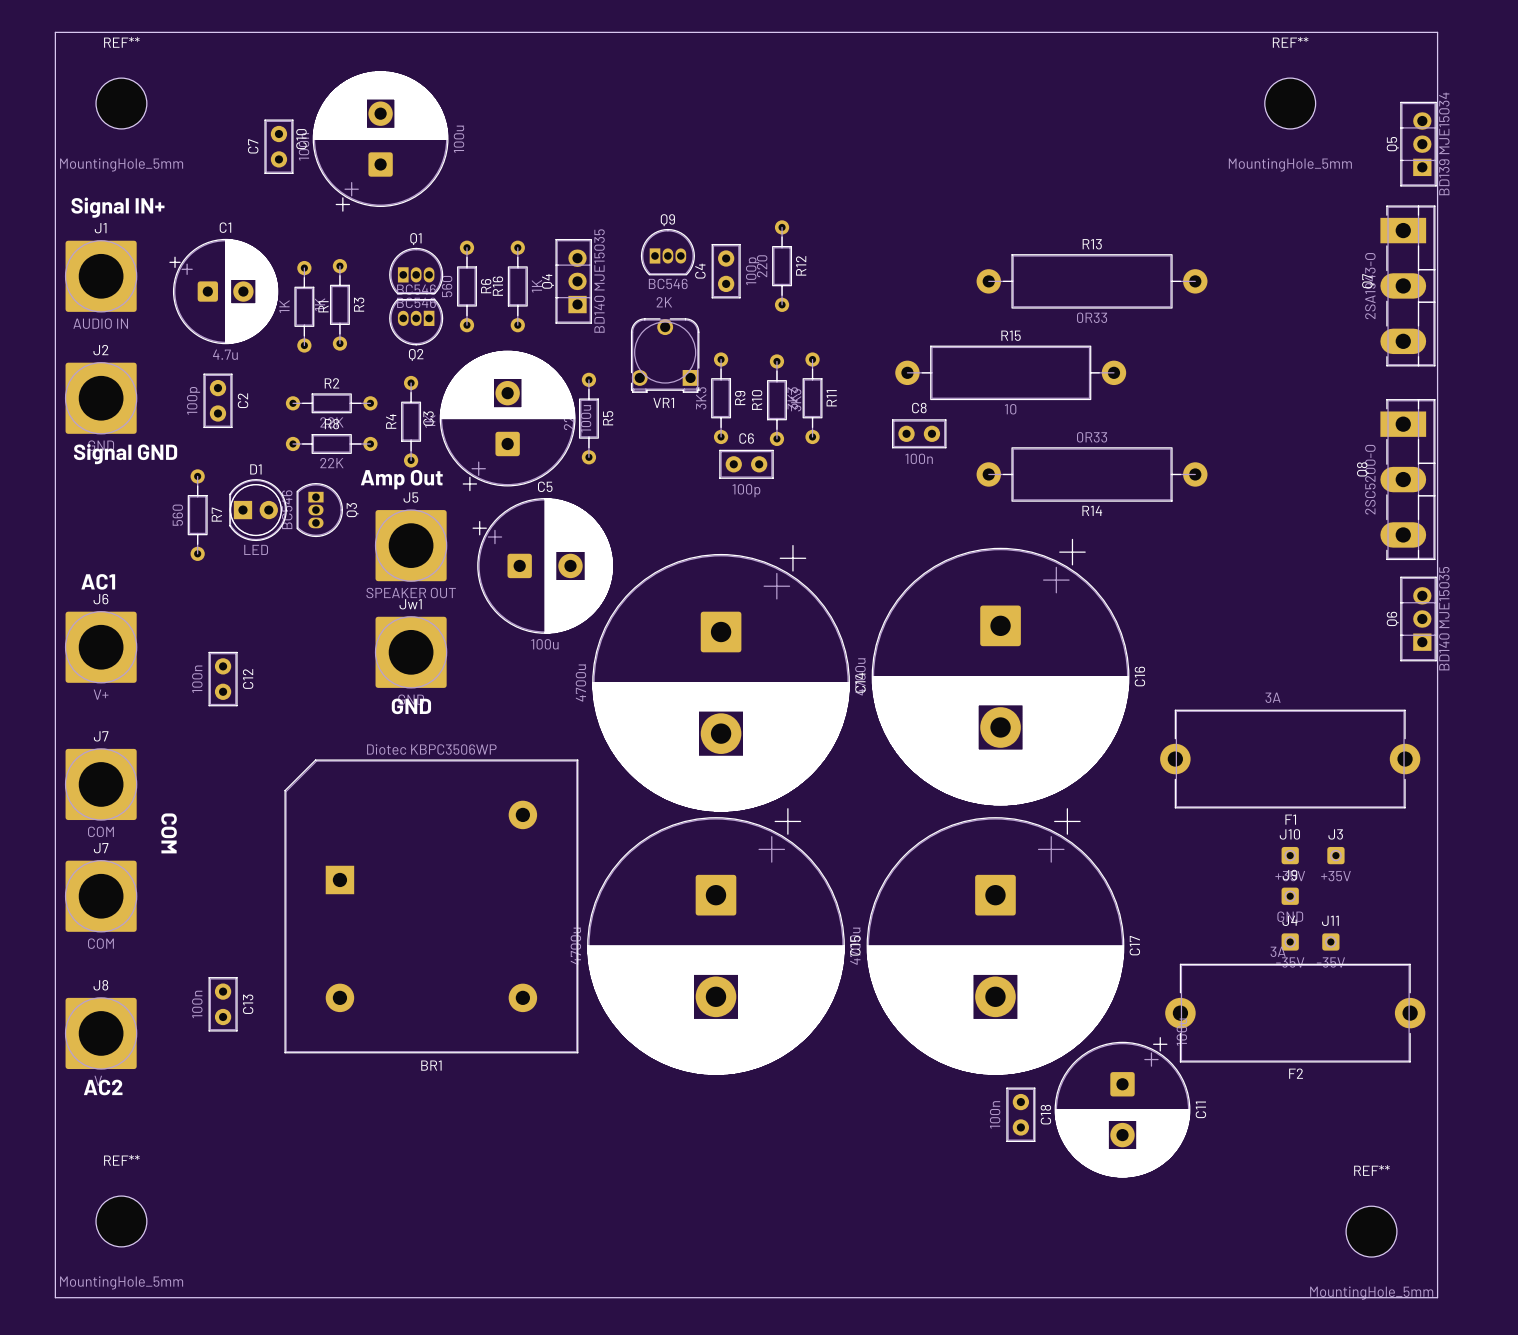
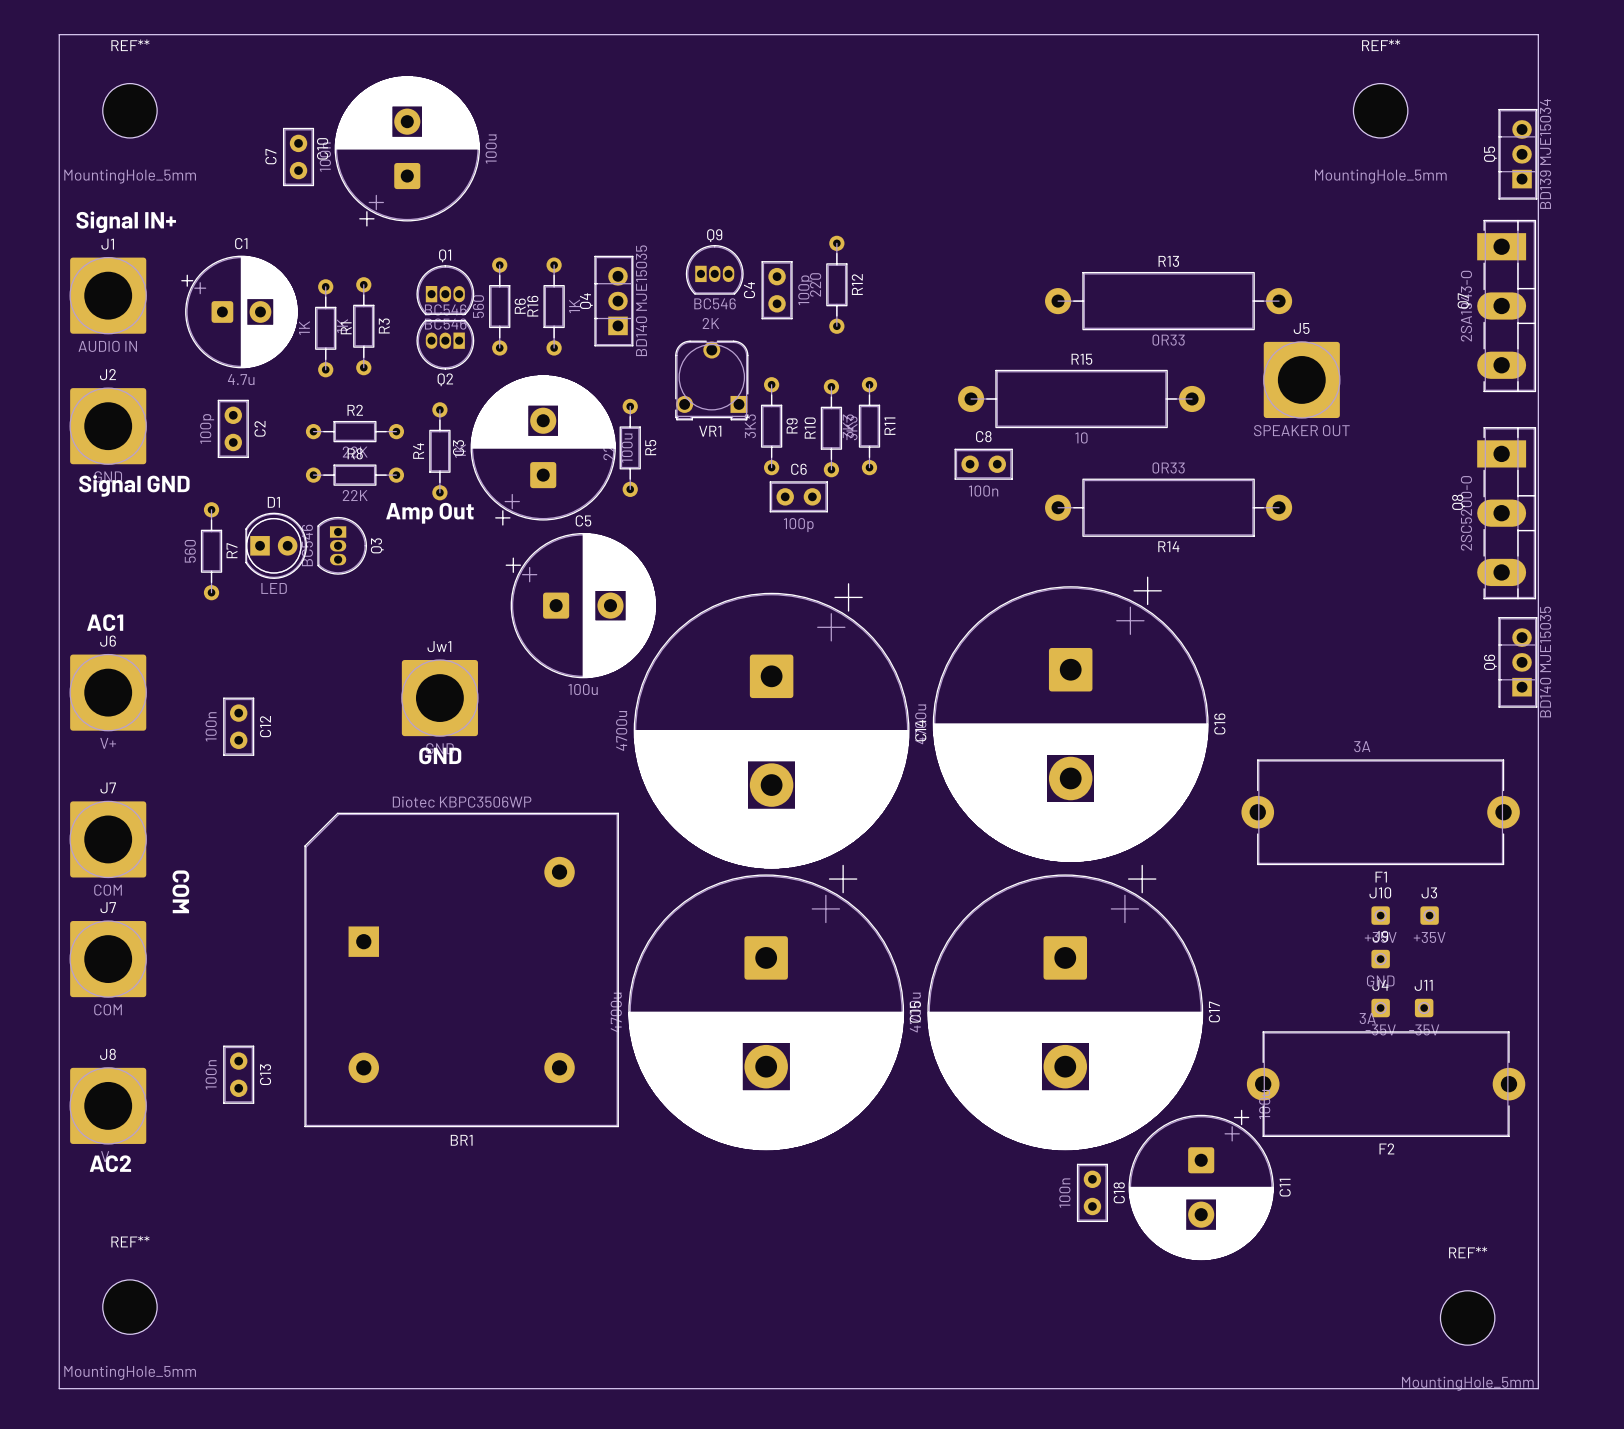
J5 position: (411, 545) -> (1301, 379)

